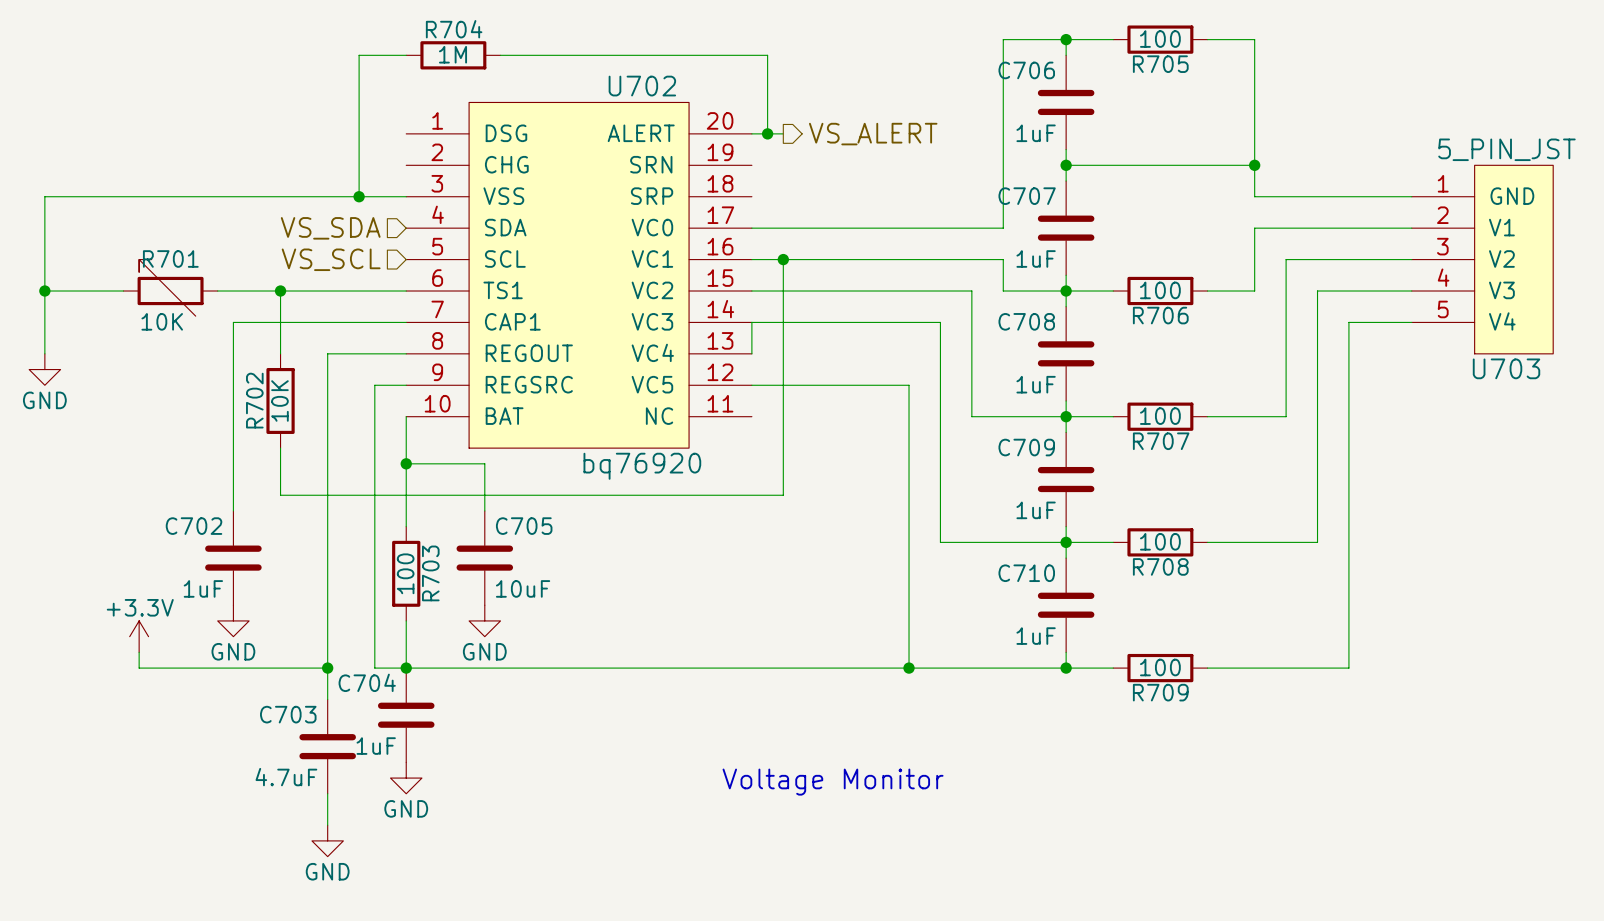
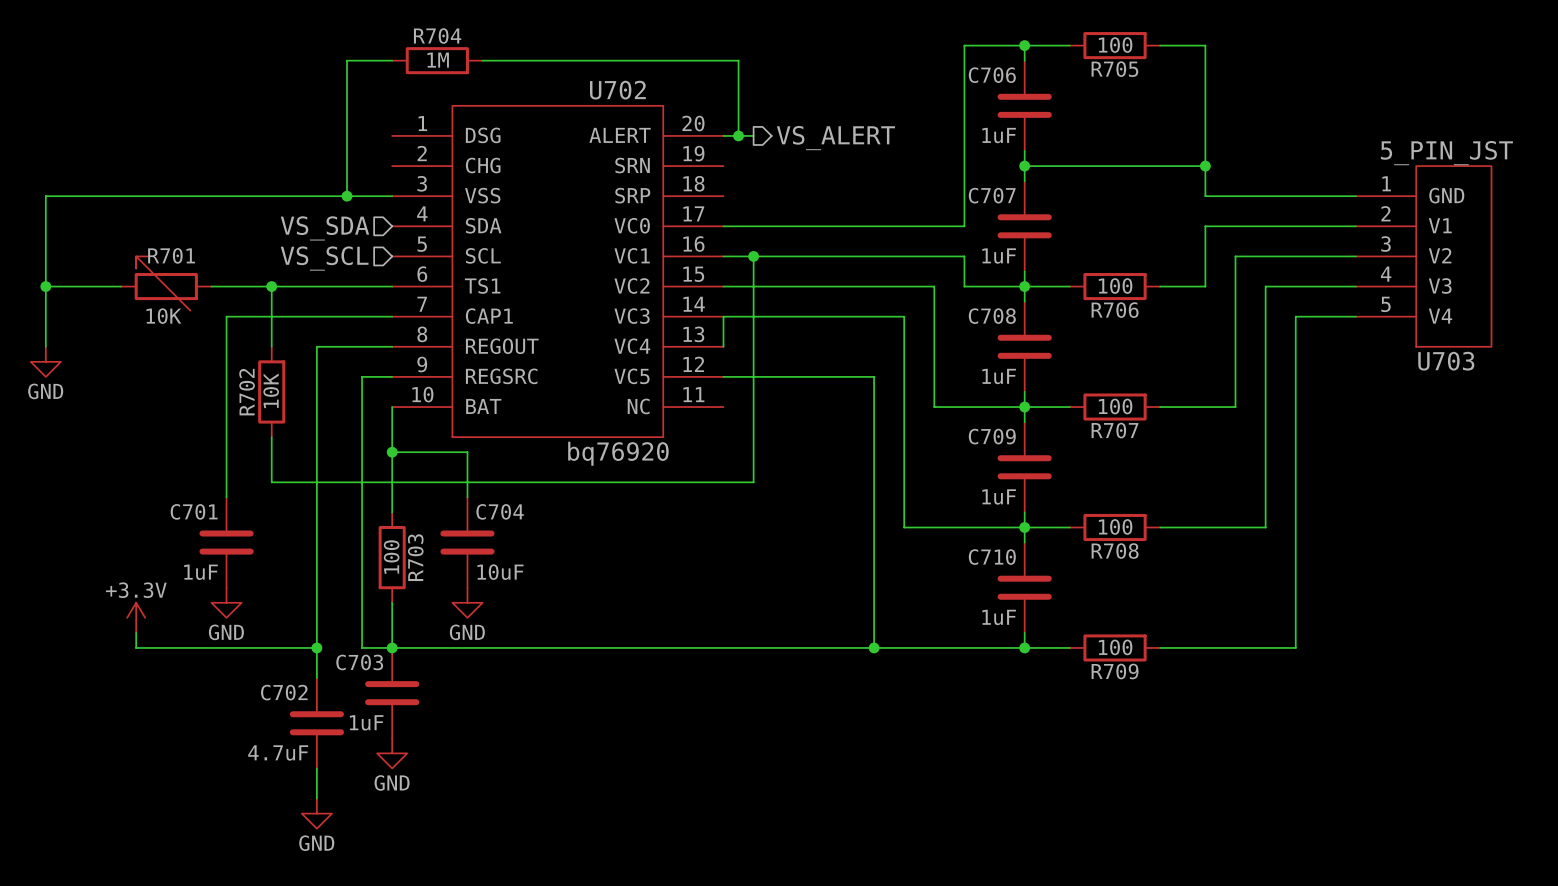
C702 name: C702 (194, 526) -> C701 (194, 511)
C705 name: C705 (524, 526) -> C704 (500, 511)
C704 name: C704 (367, 682) -> C703 (359, 662)
C703 name: C703 (288, 714) -> C702 (284, 692)
text: Voltage Monitor (833, 782) -> none

